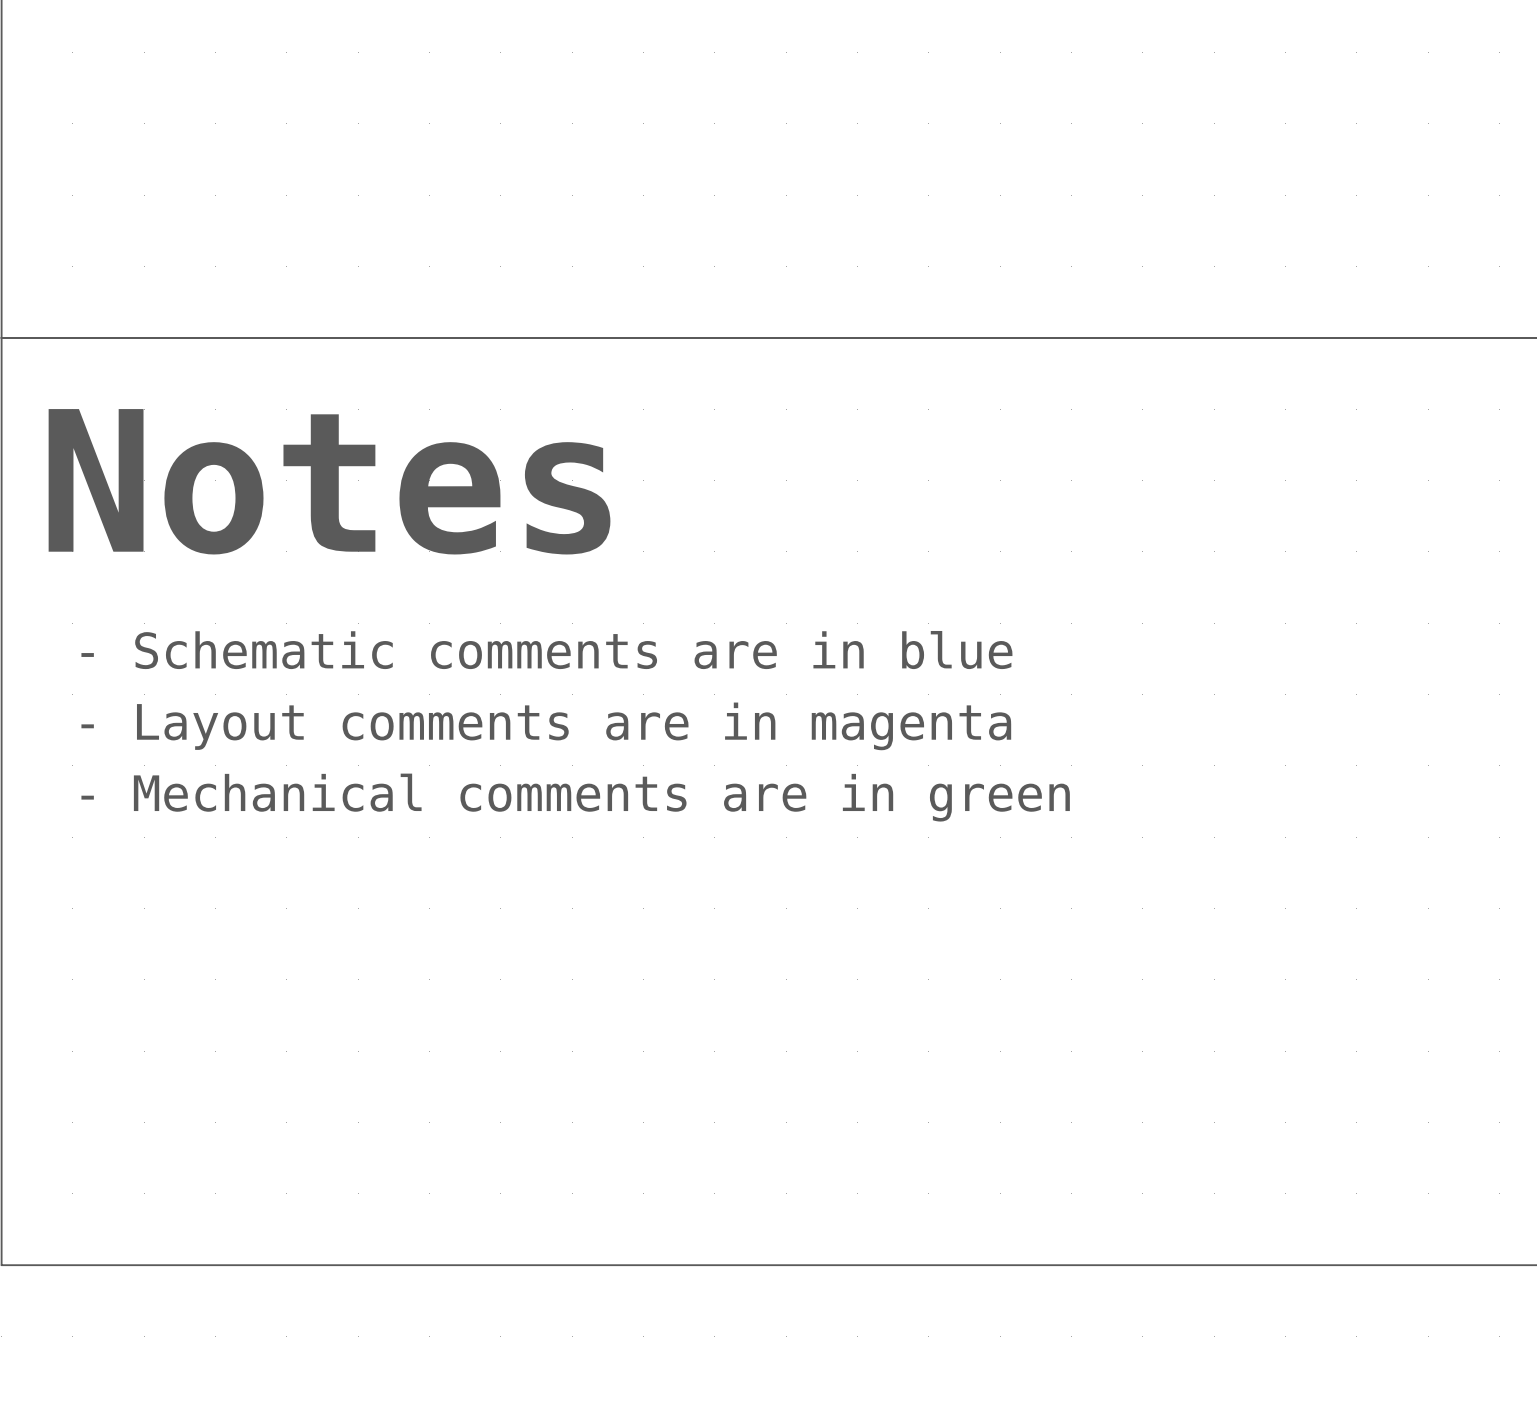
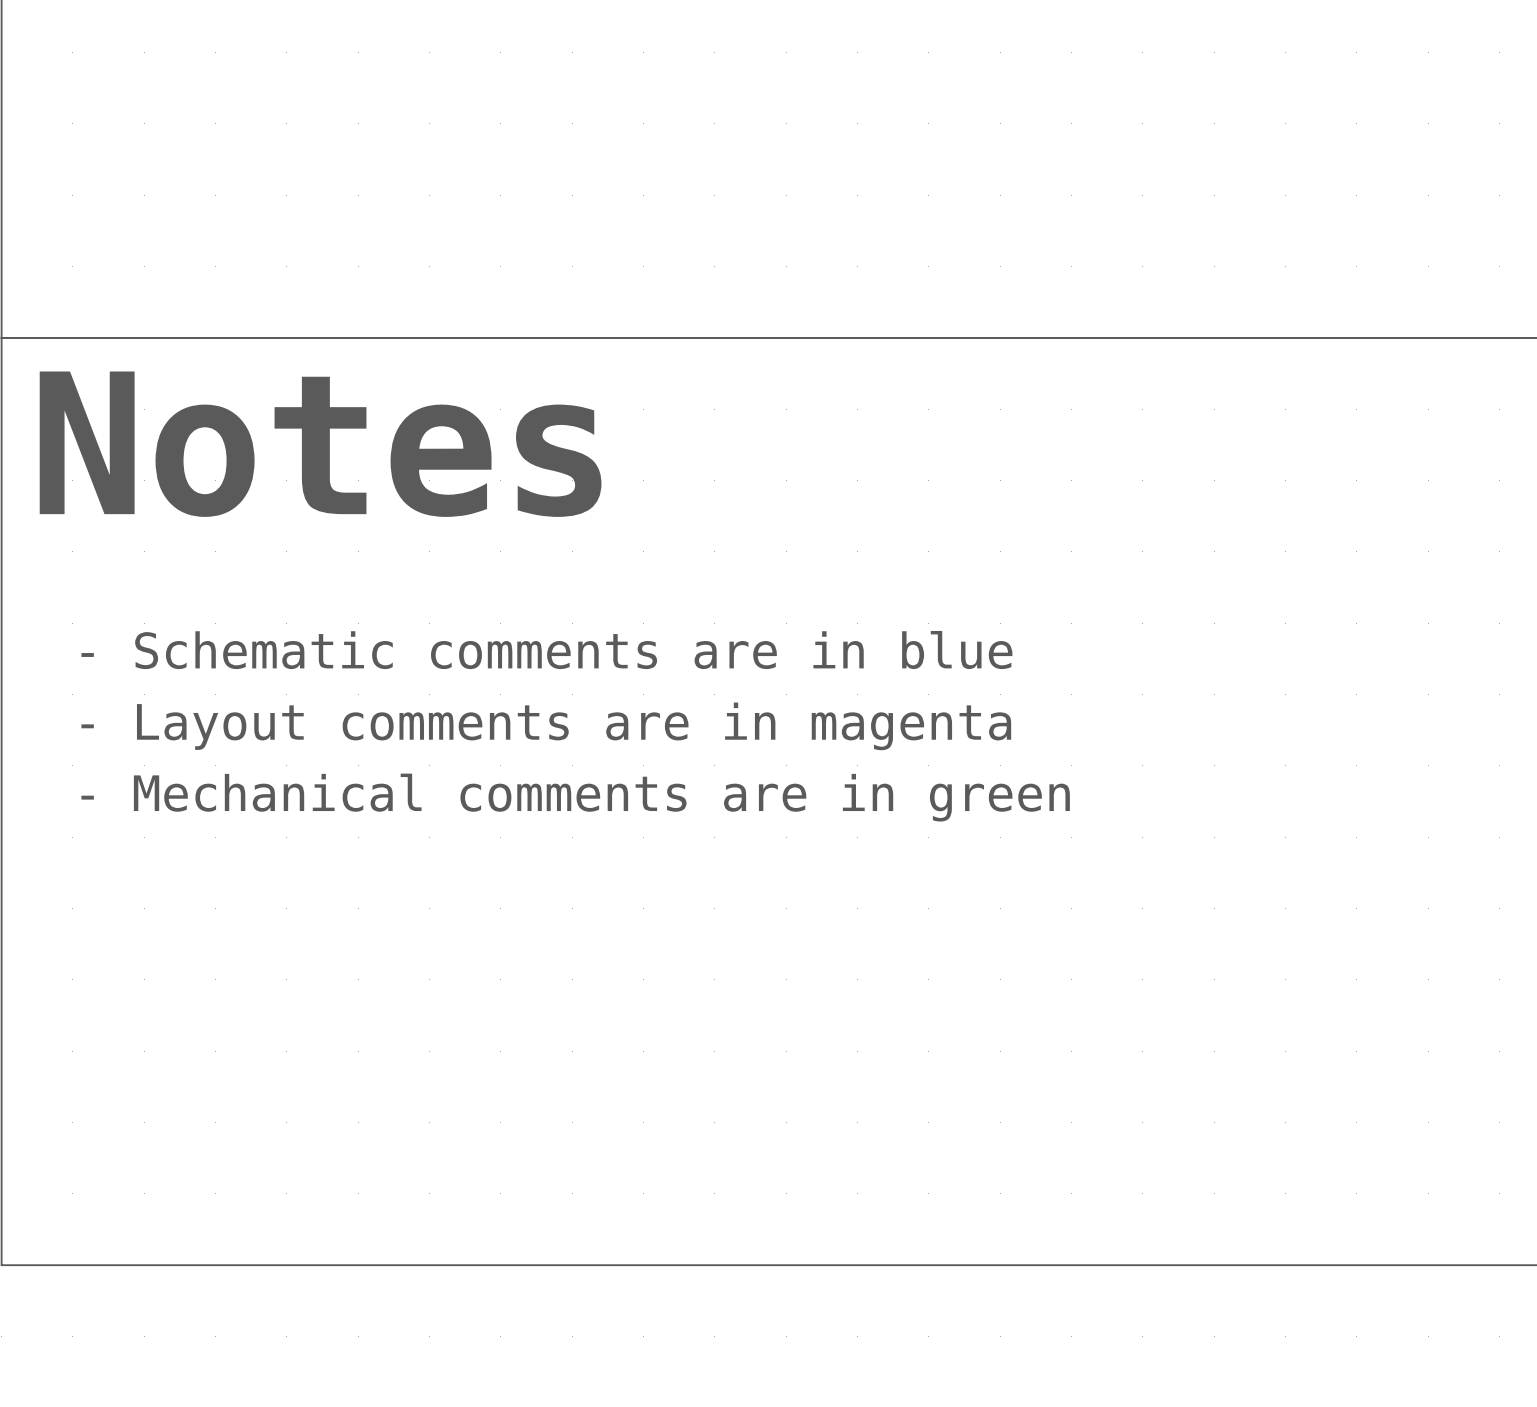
text position: Notes (329, 481) -> Notes (320, 444)

